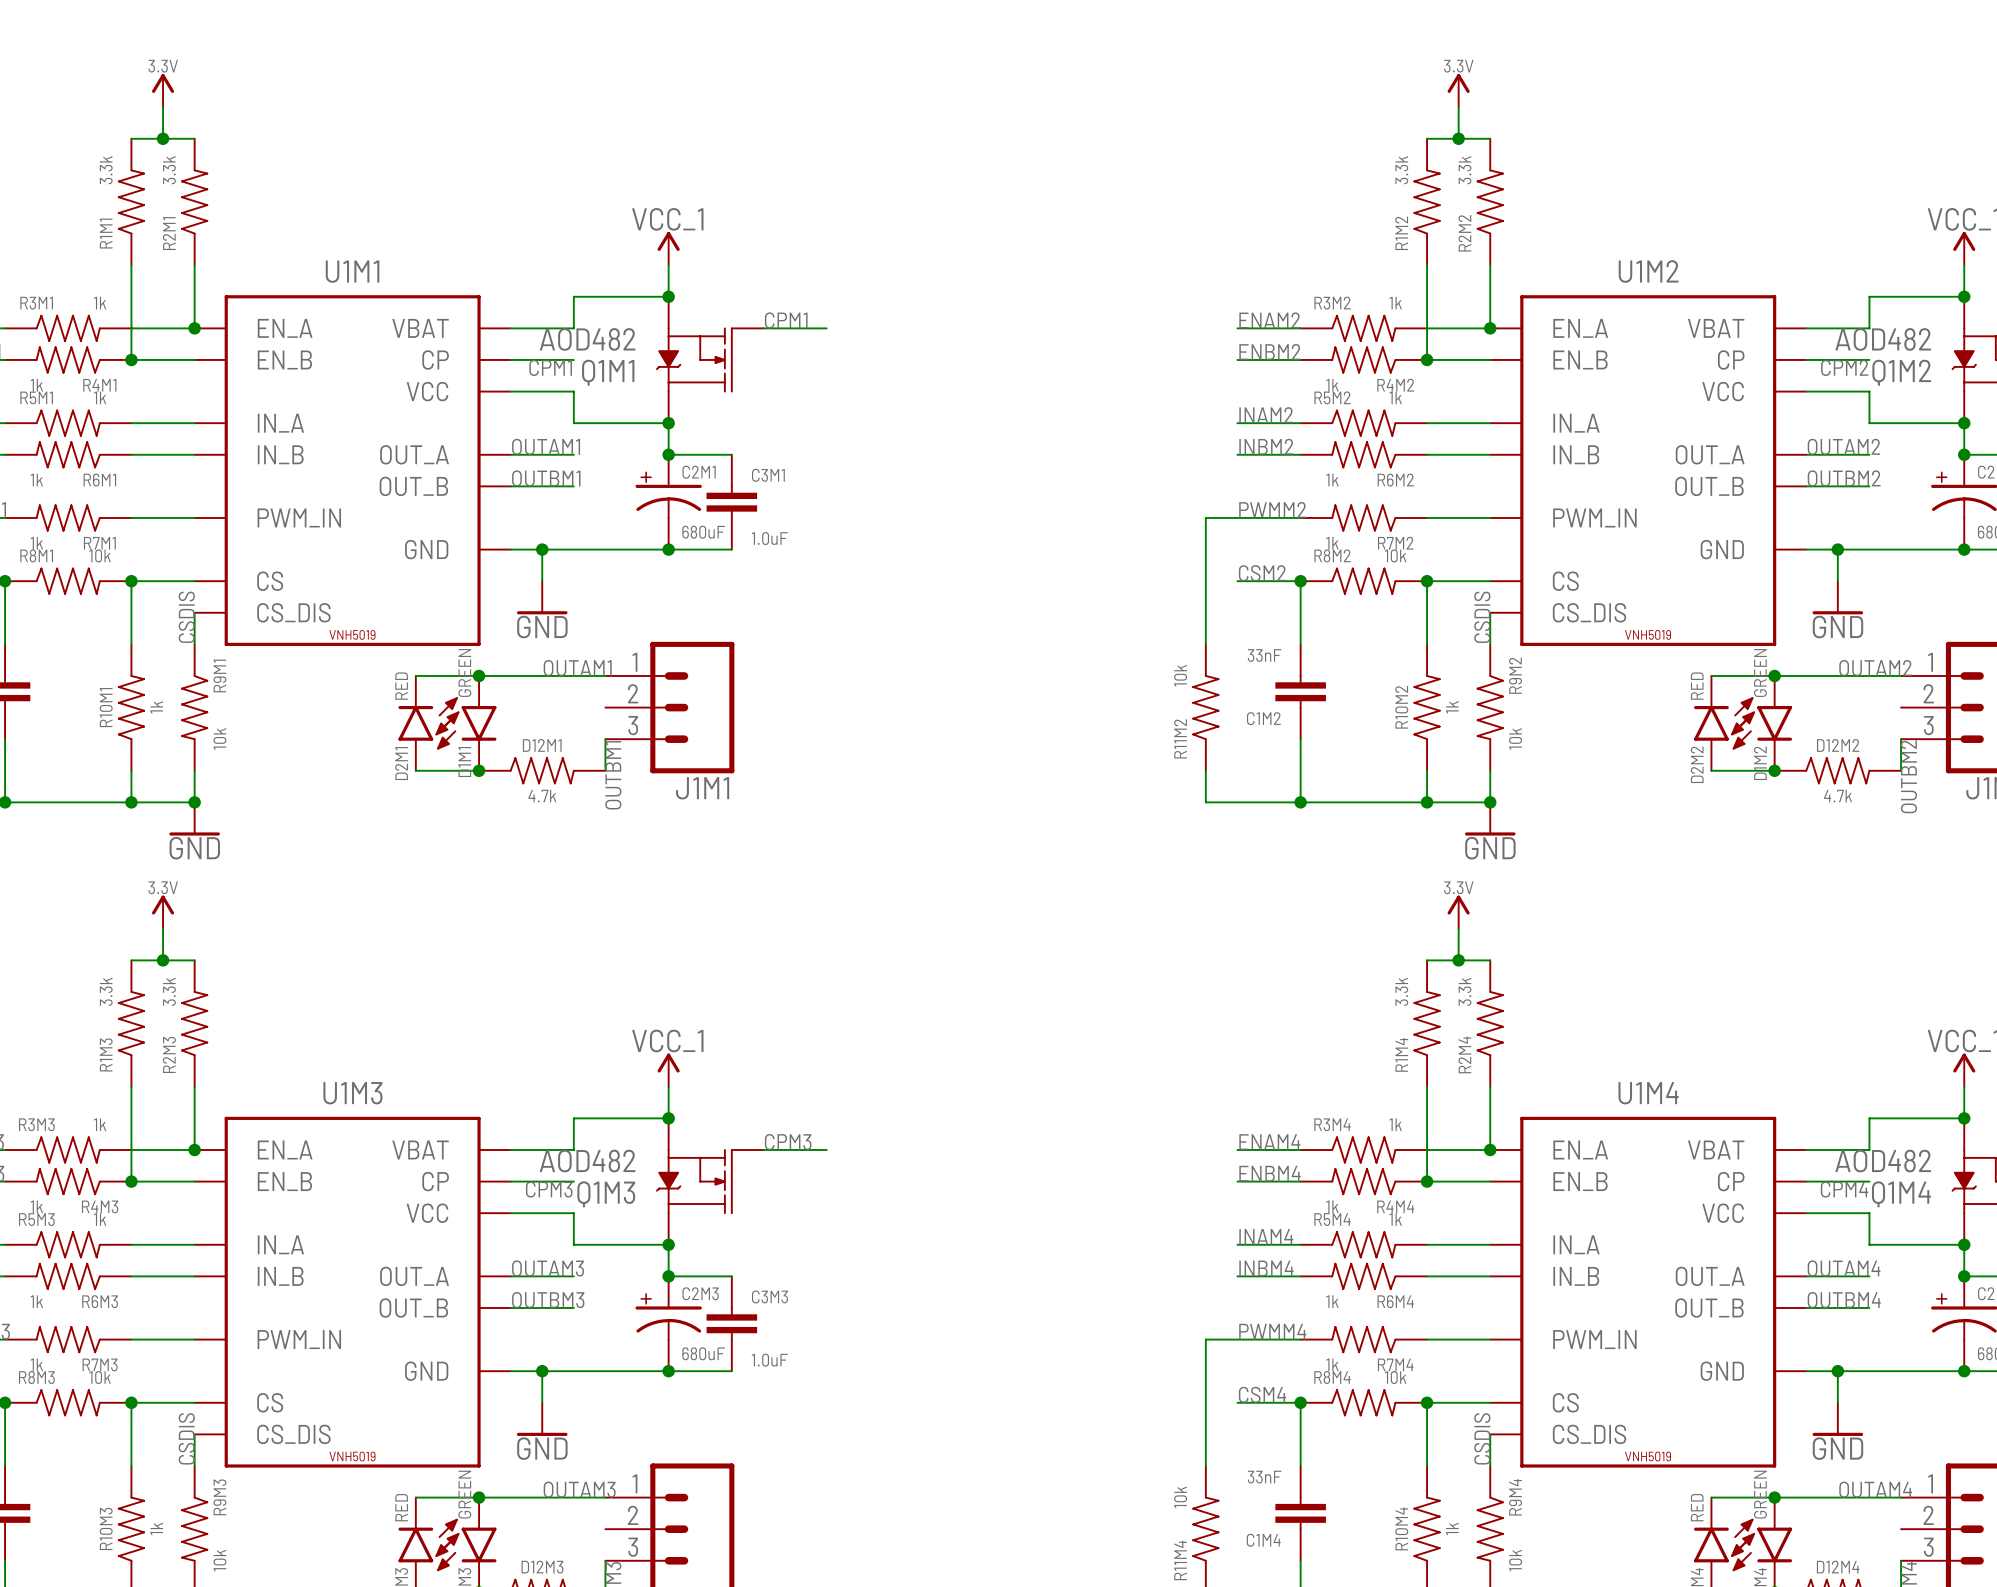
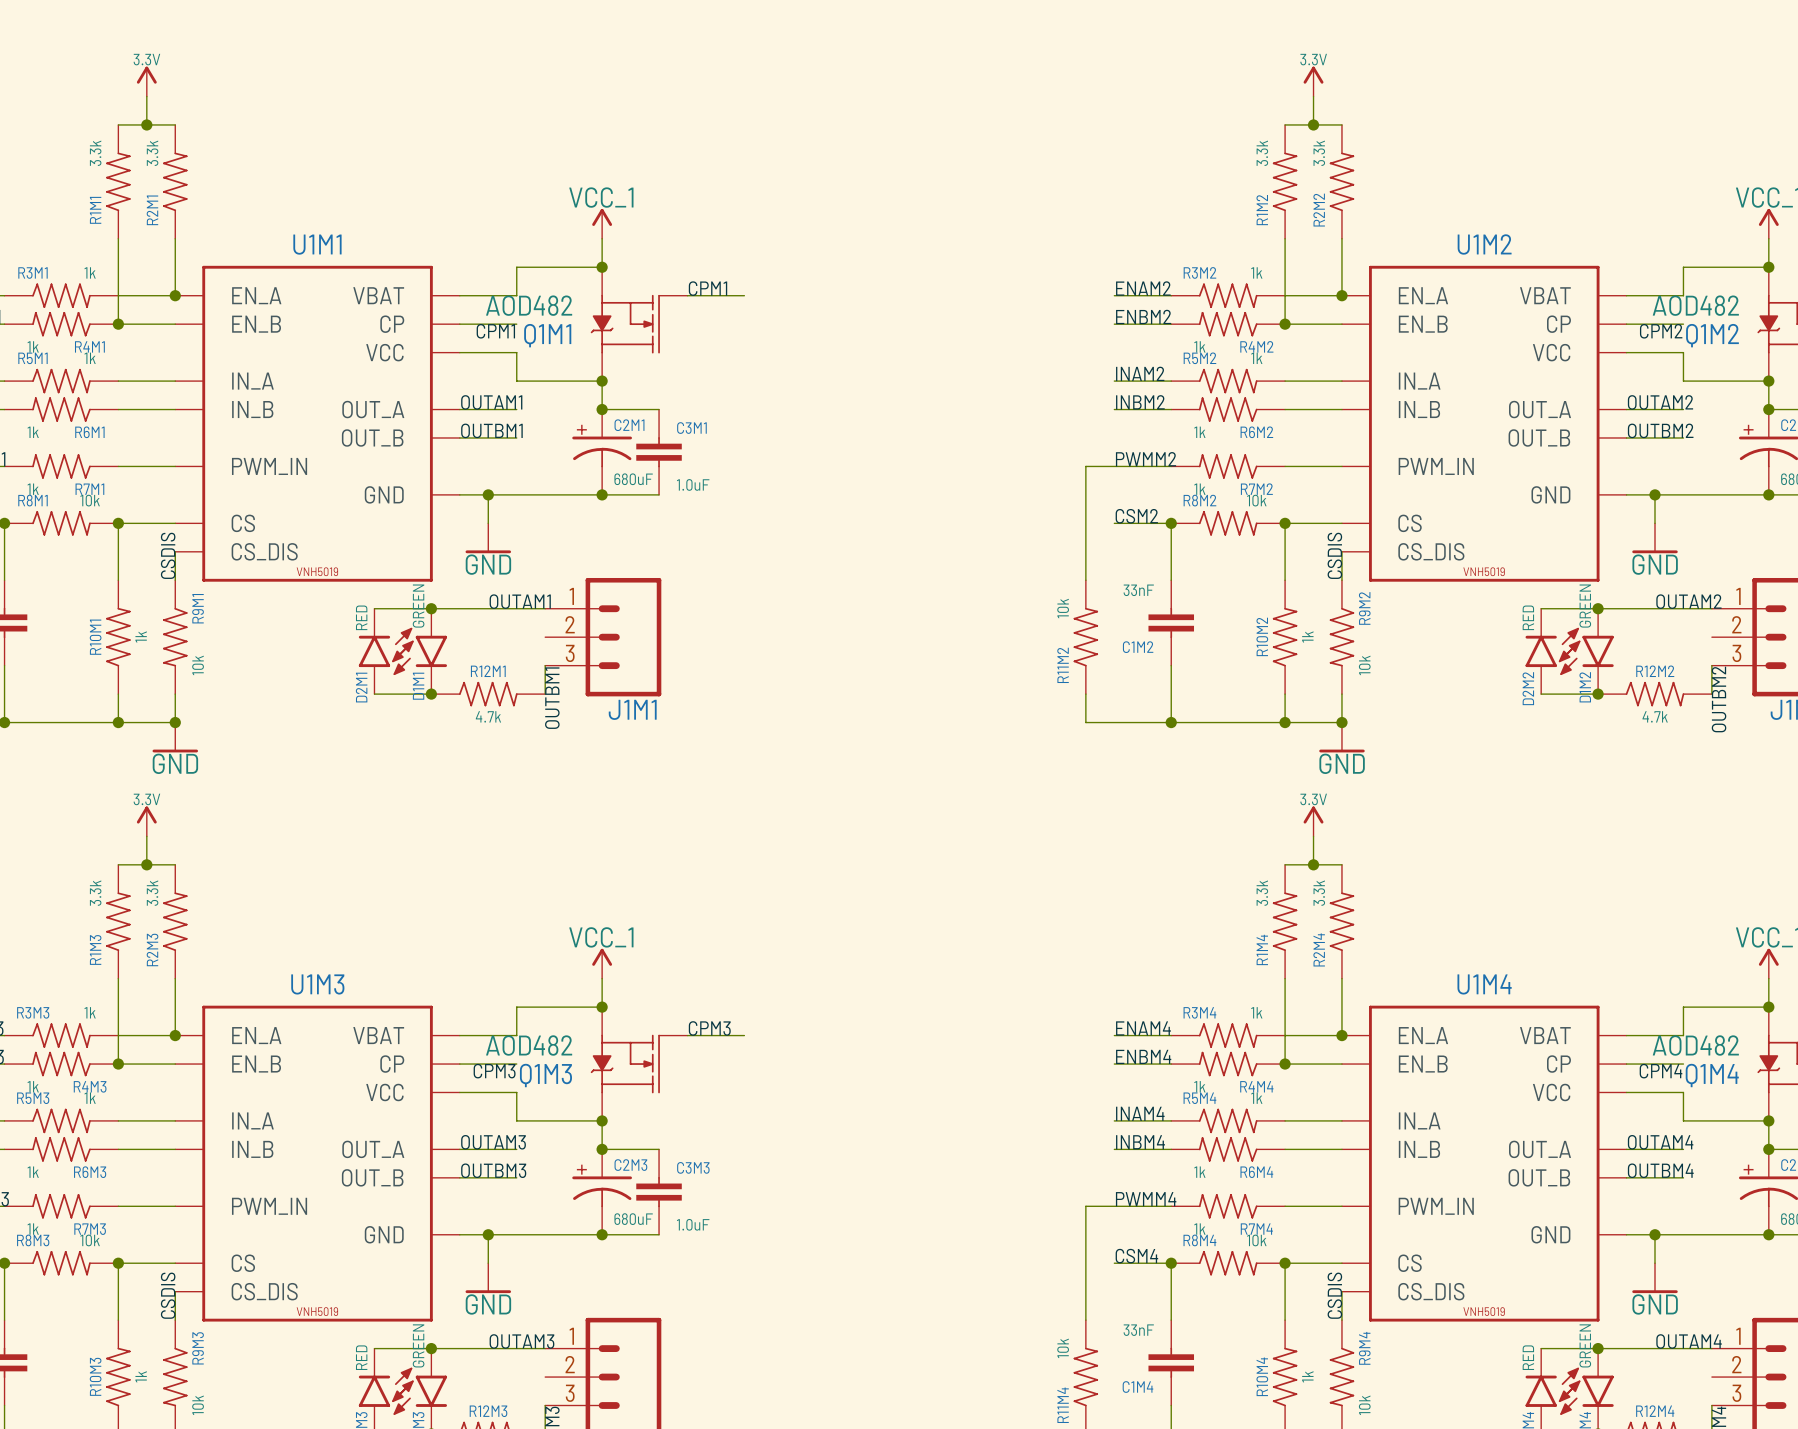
D12M1 name: D12M1 (542, 745) -> R12M1 (488, 671)
D12M2 name: D12M2 (1838, 745) -> R12M2 (1655, 671)
D12M3 name: D12M3 (542, 1567) -> R12M3 (488, 1411)
D12M4 name: D12M4 (1838, 1567) -> R12M4 (1655, 1411)

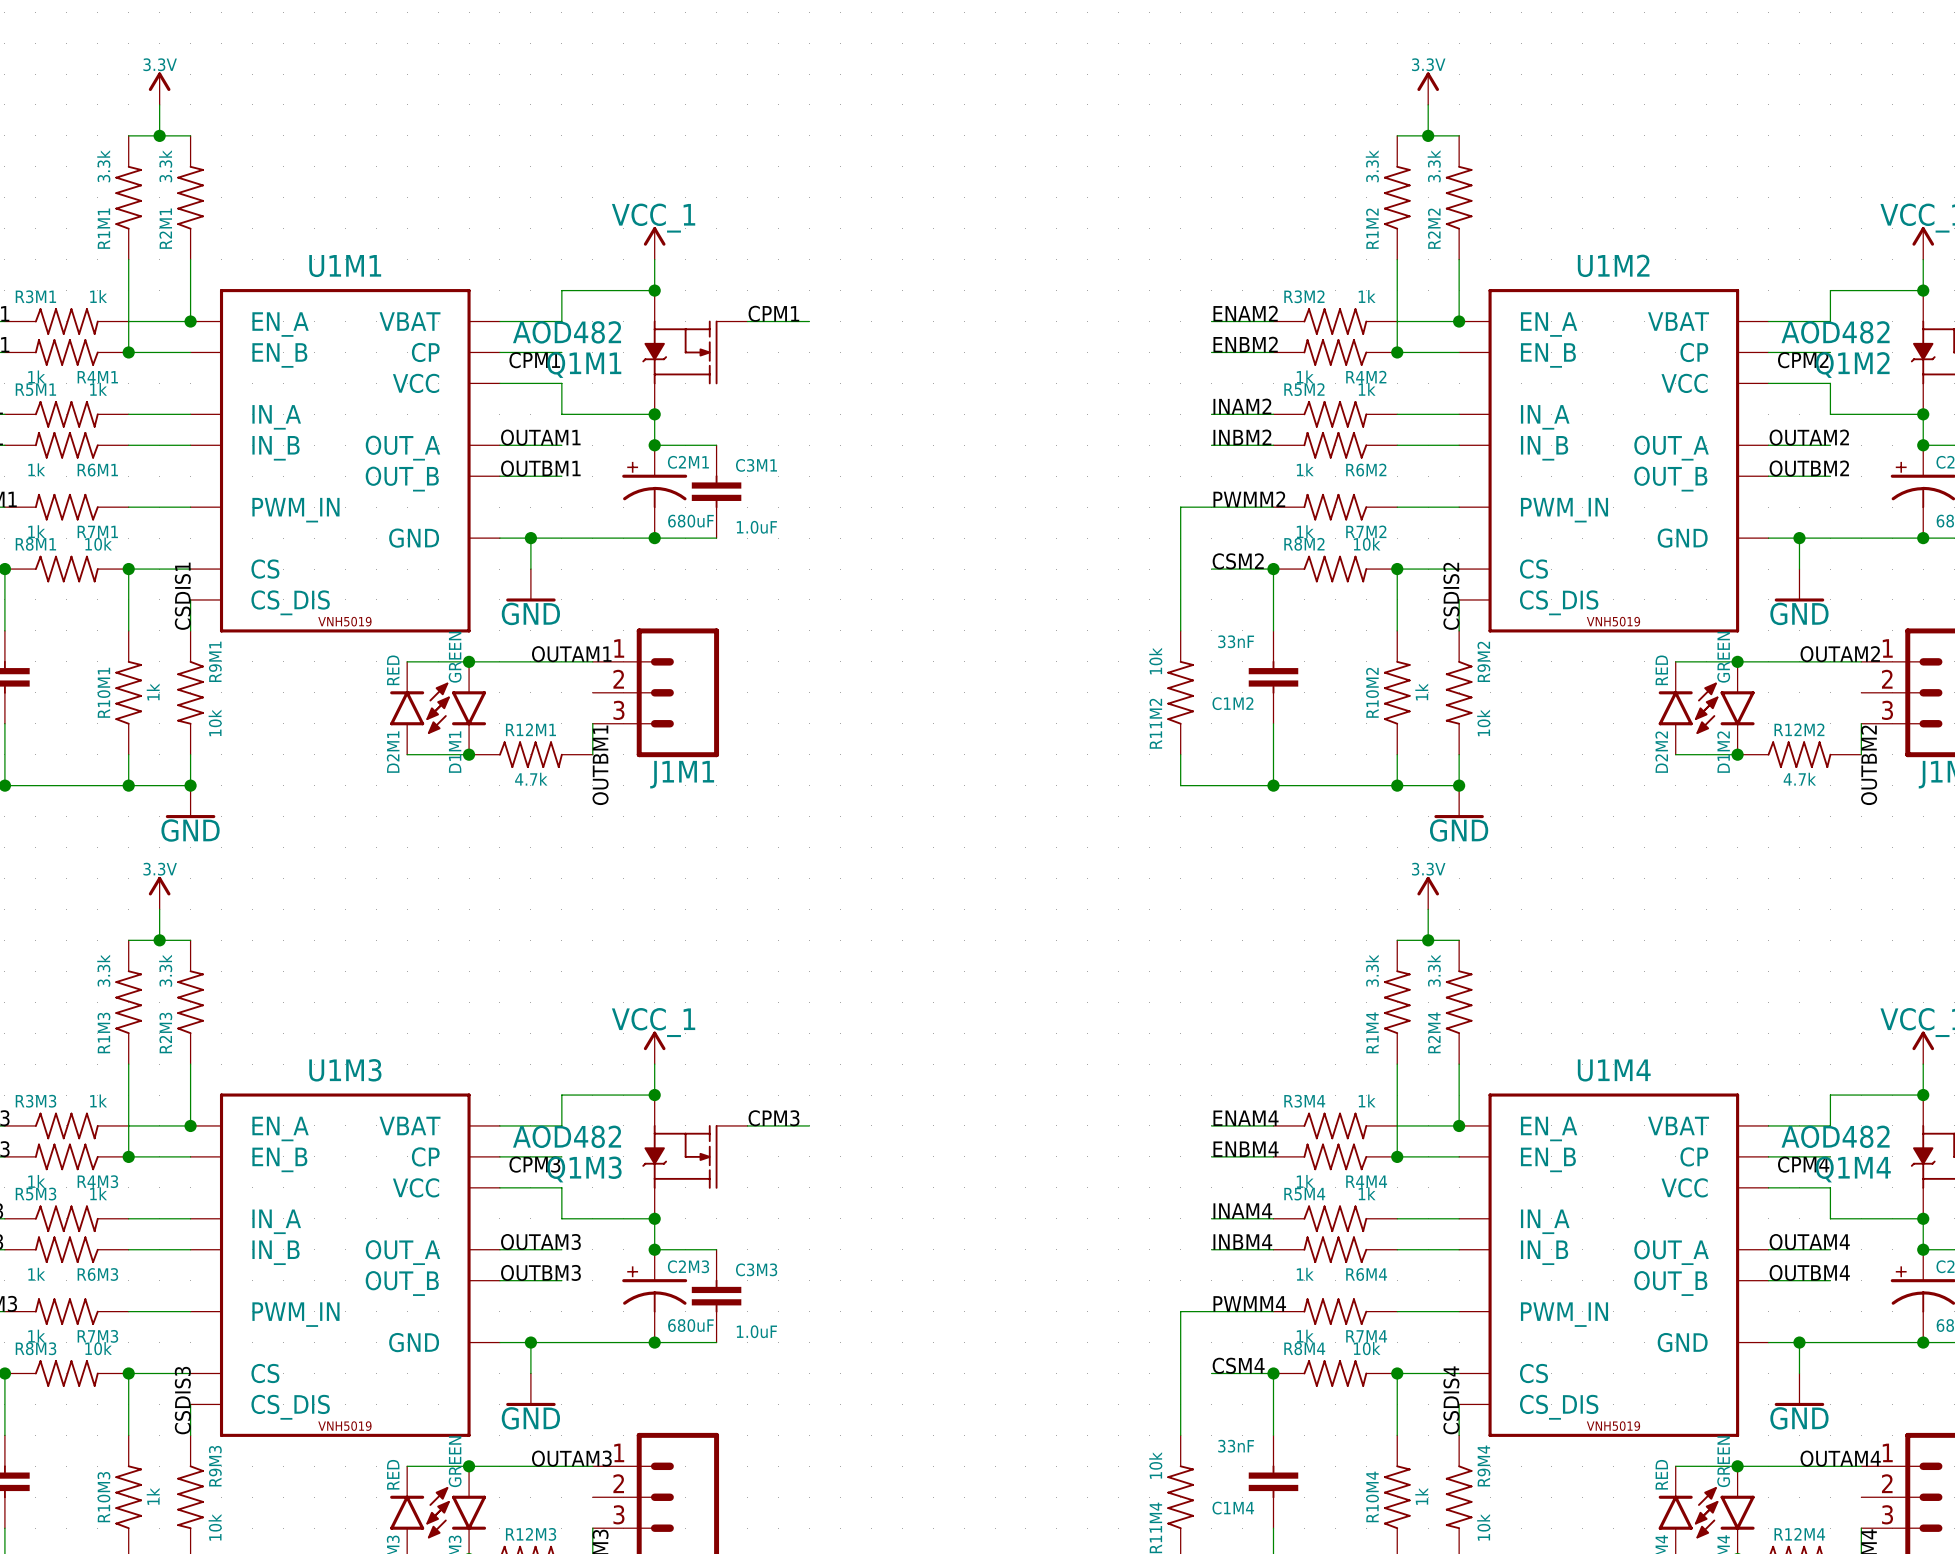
label: CSDIS (168, 555) -> CSDIS1 (182, 596)
label: CSDIS (1334, 555) -> CSDIS2 (1451, 596)
label: CSDIS (168, 1295) -> CSDIS3 (182, 1400)
label: CSDIS (1334, 1295) -> CSDIS4 (1451, 1400)

